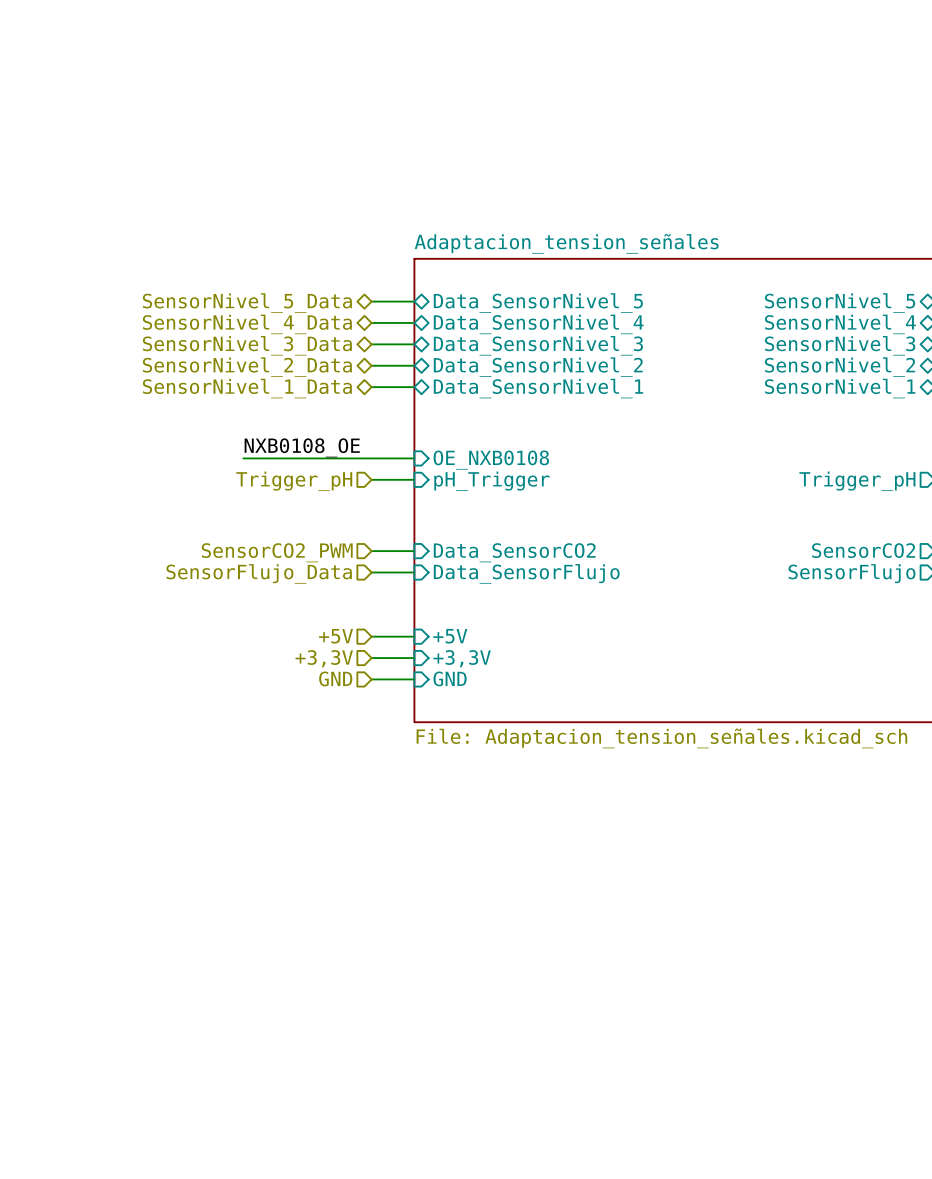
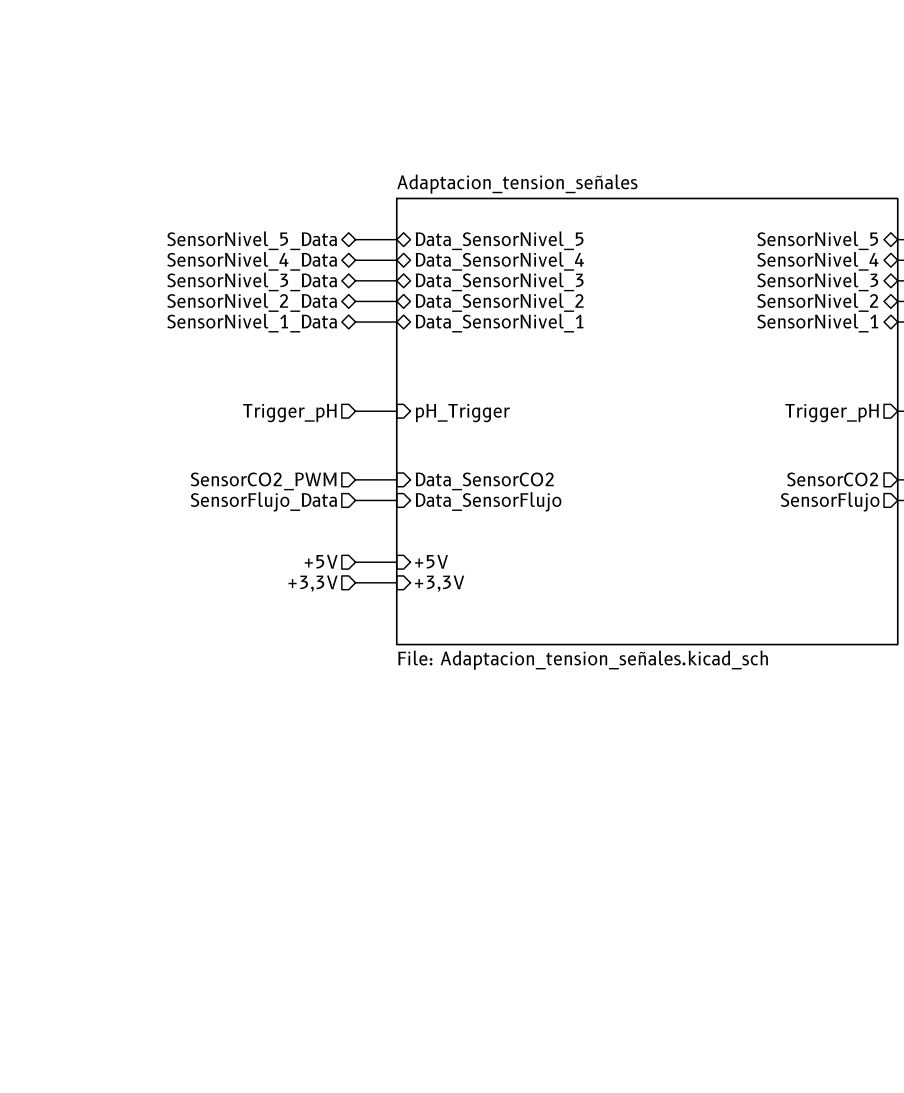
label: NXB0108_OE (302, 447) -> none
wire: (243, 458) (414, 458) -> none
sheet pin: OE_NXB0108 (491, 460) -> none
hierarchical label: GND (335, 678) -> none
sheet pin: GND (450, 678) -> none
wire: (371, 679) (414, 679) -> none

